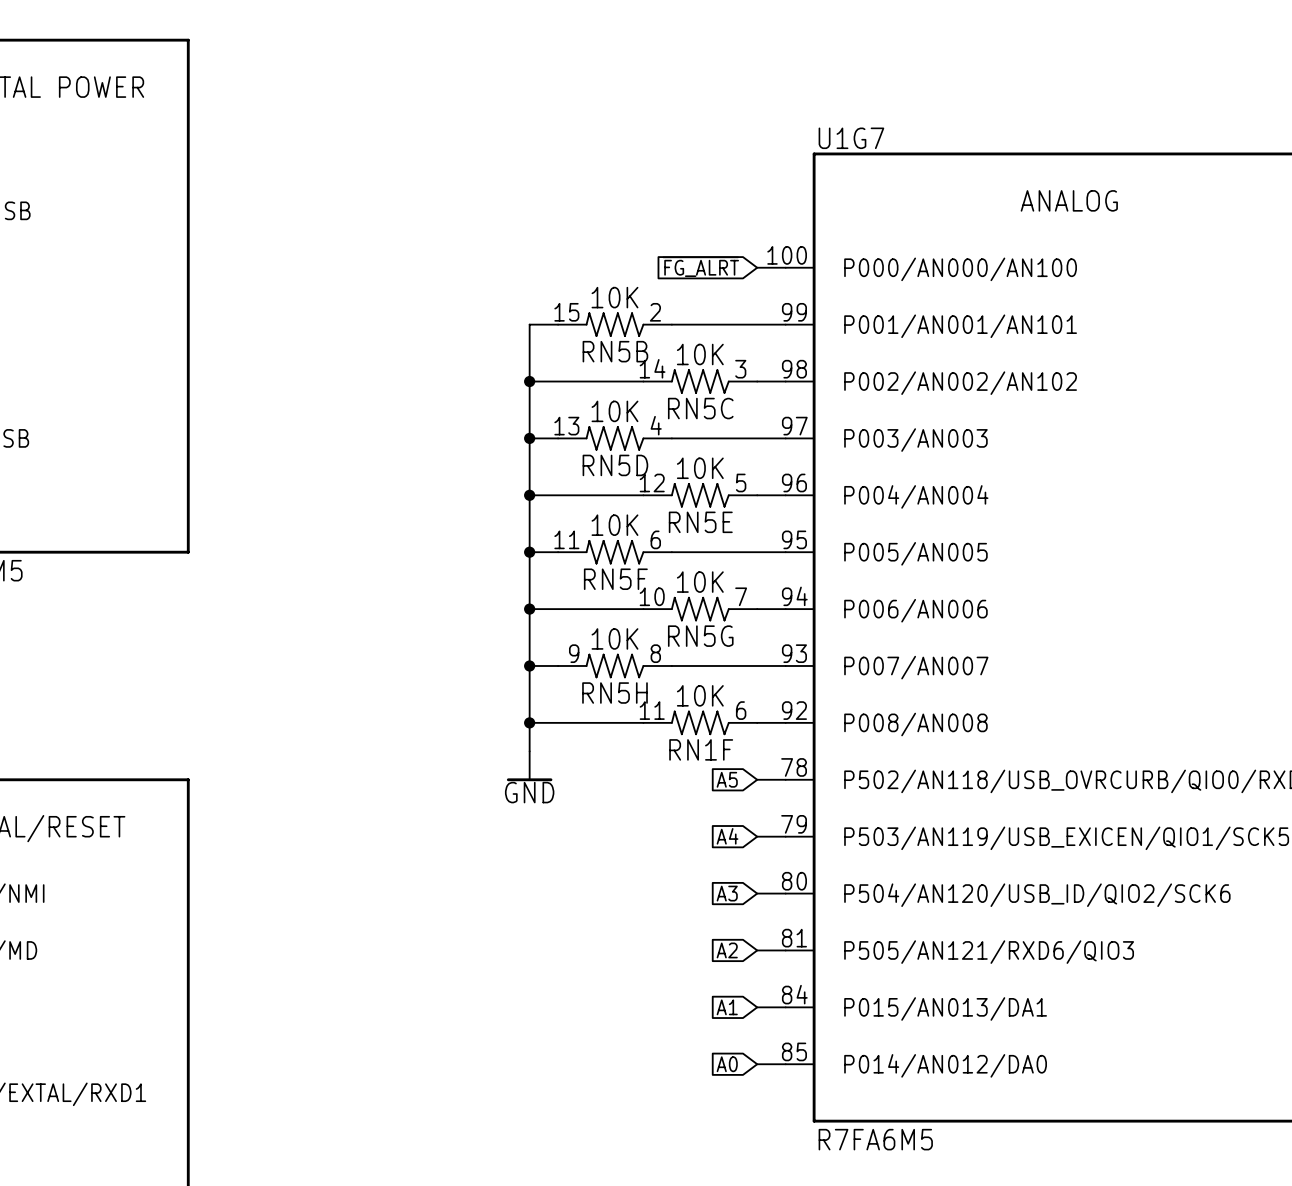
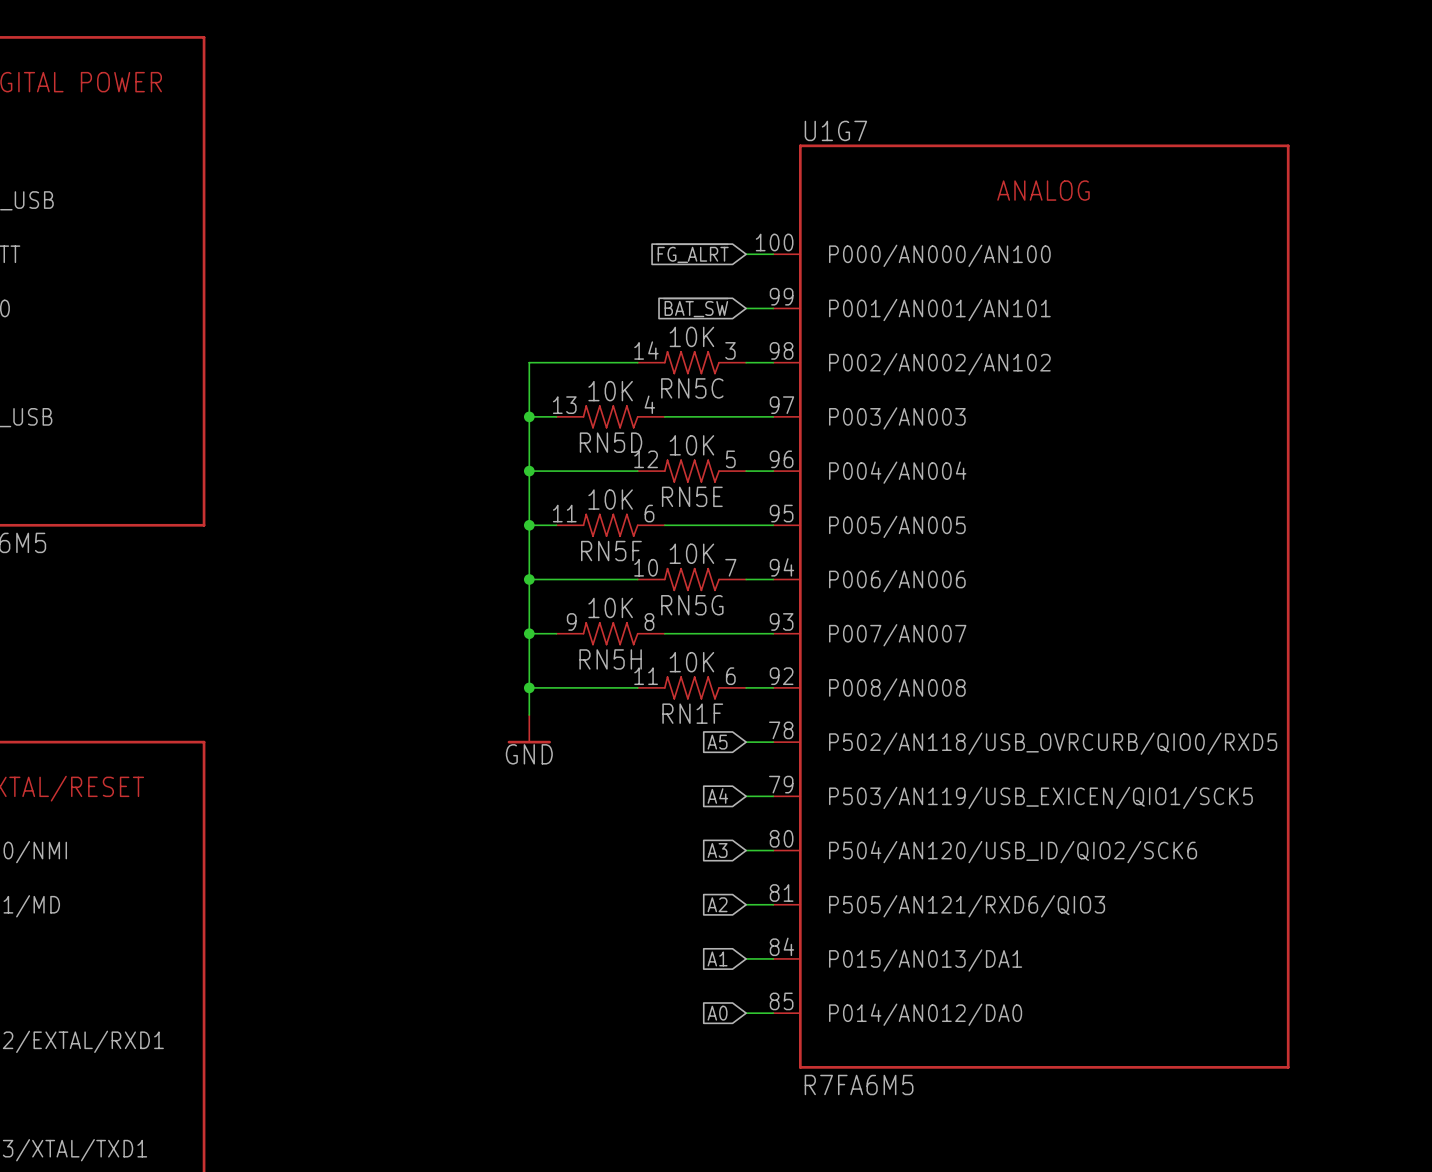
global label: none -> ~{BAT_SW} (695, 307)
wire: (558, 324) (529, 324) (529, 381) -> none
RN5B: 10K (614, 324) -> none
wire: (671, 324) (757, 324) -> none
junction: (529, 381) -> none

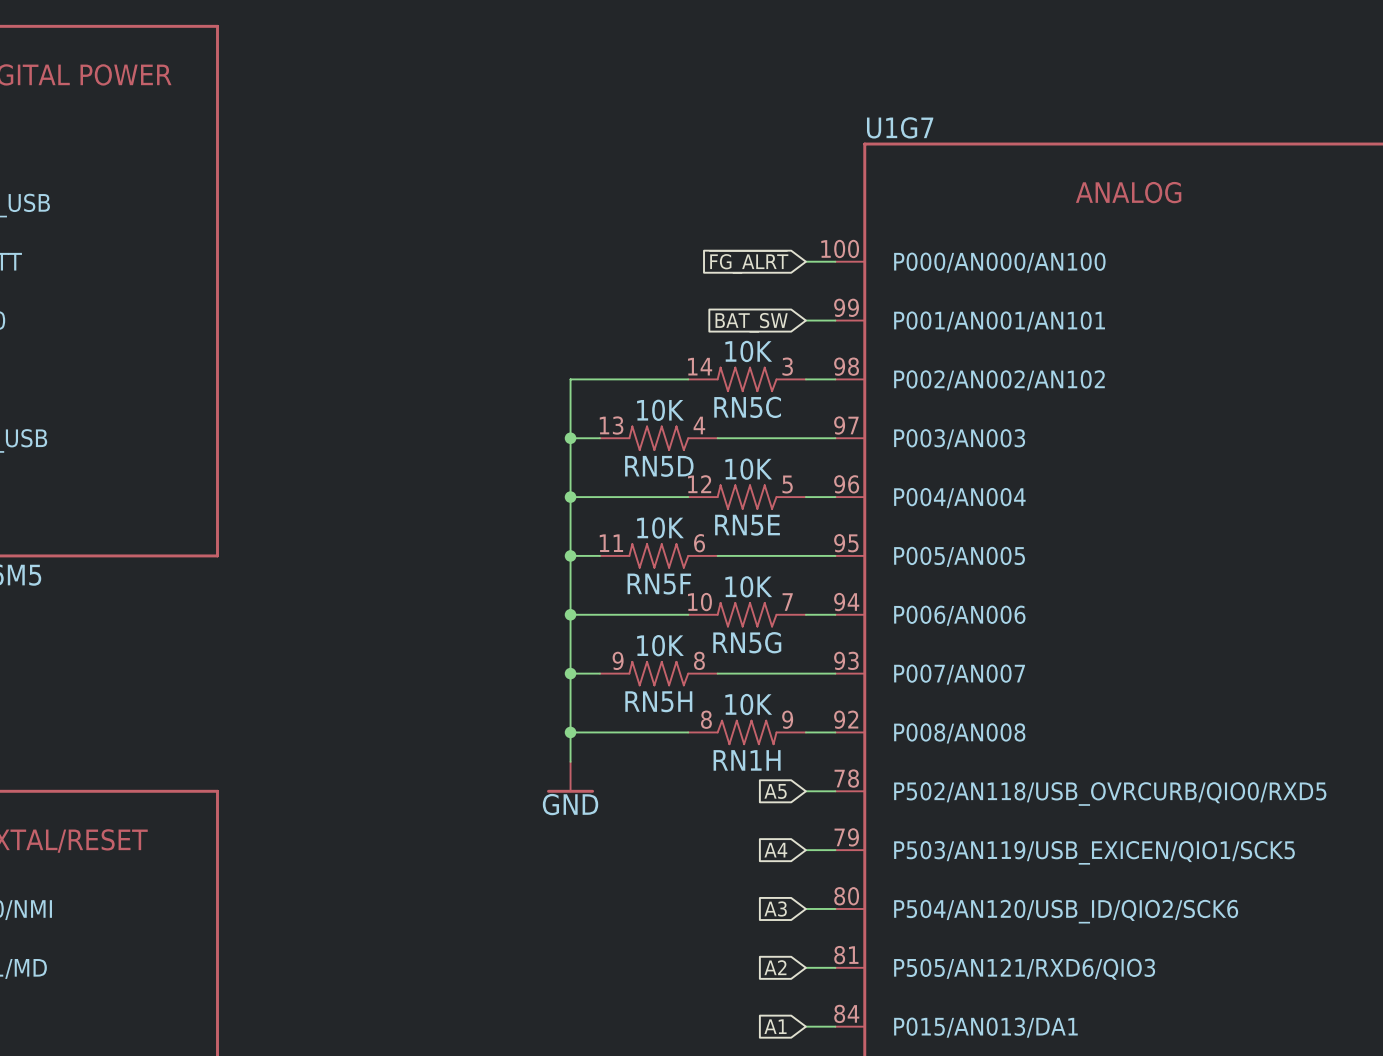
global label: ~{BAT_SW} (695, 307) -> BAT_SW (751, 322)
RN1F: 10K (691, 687) -> none
RN1H: none -> 10K (747, 732)

